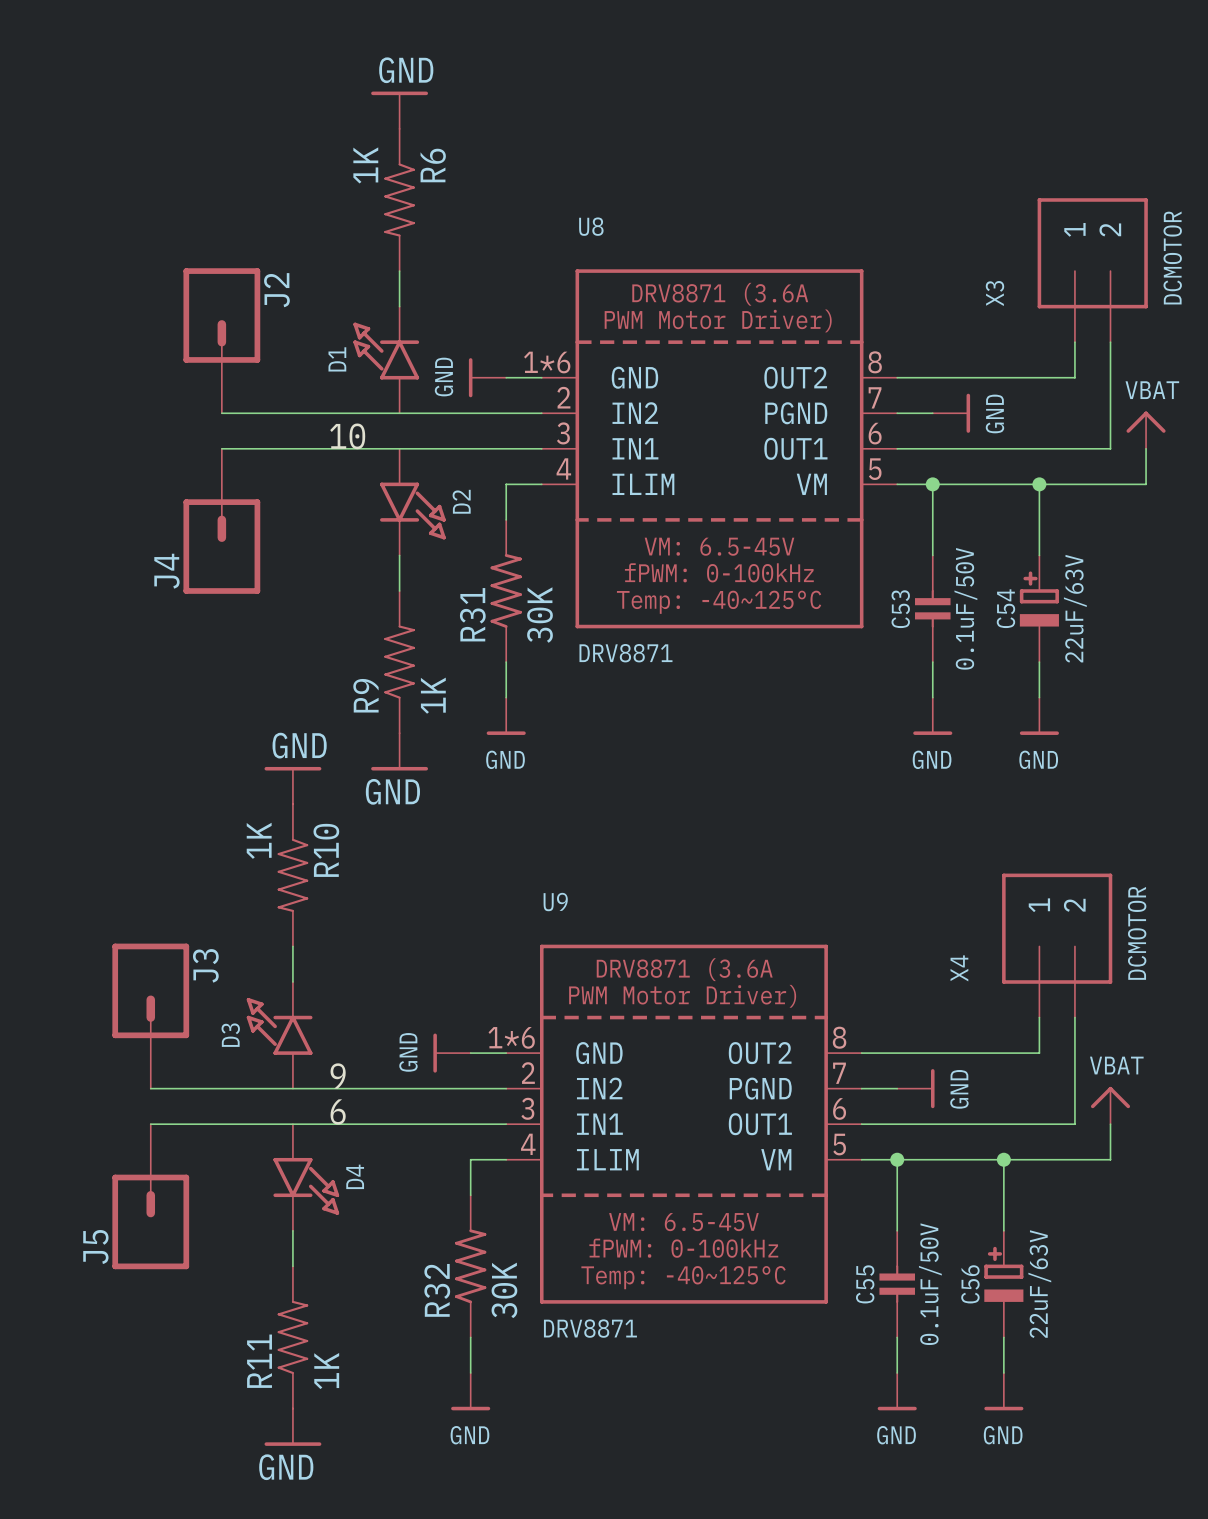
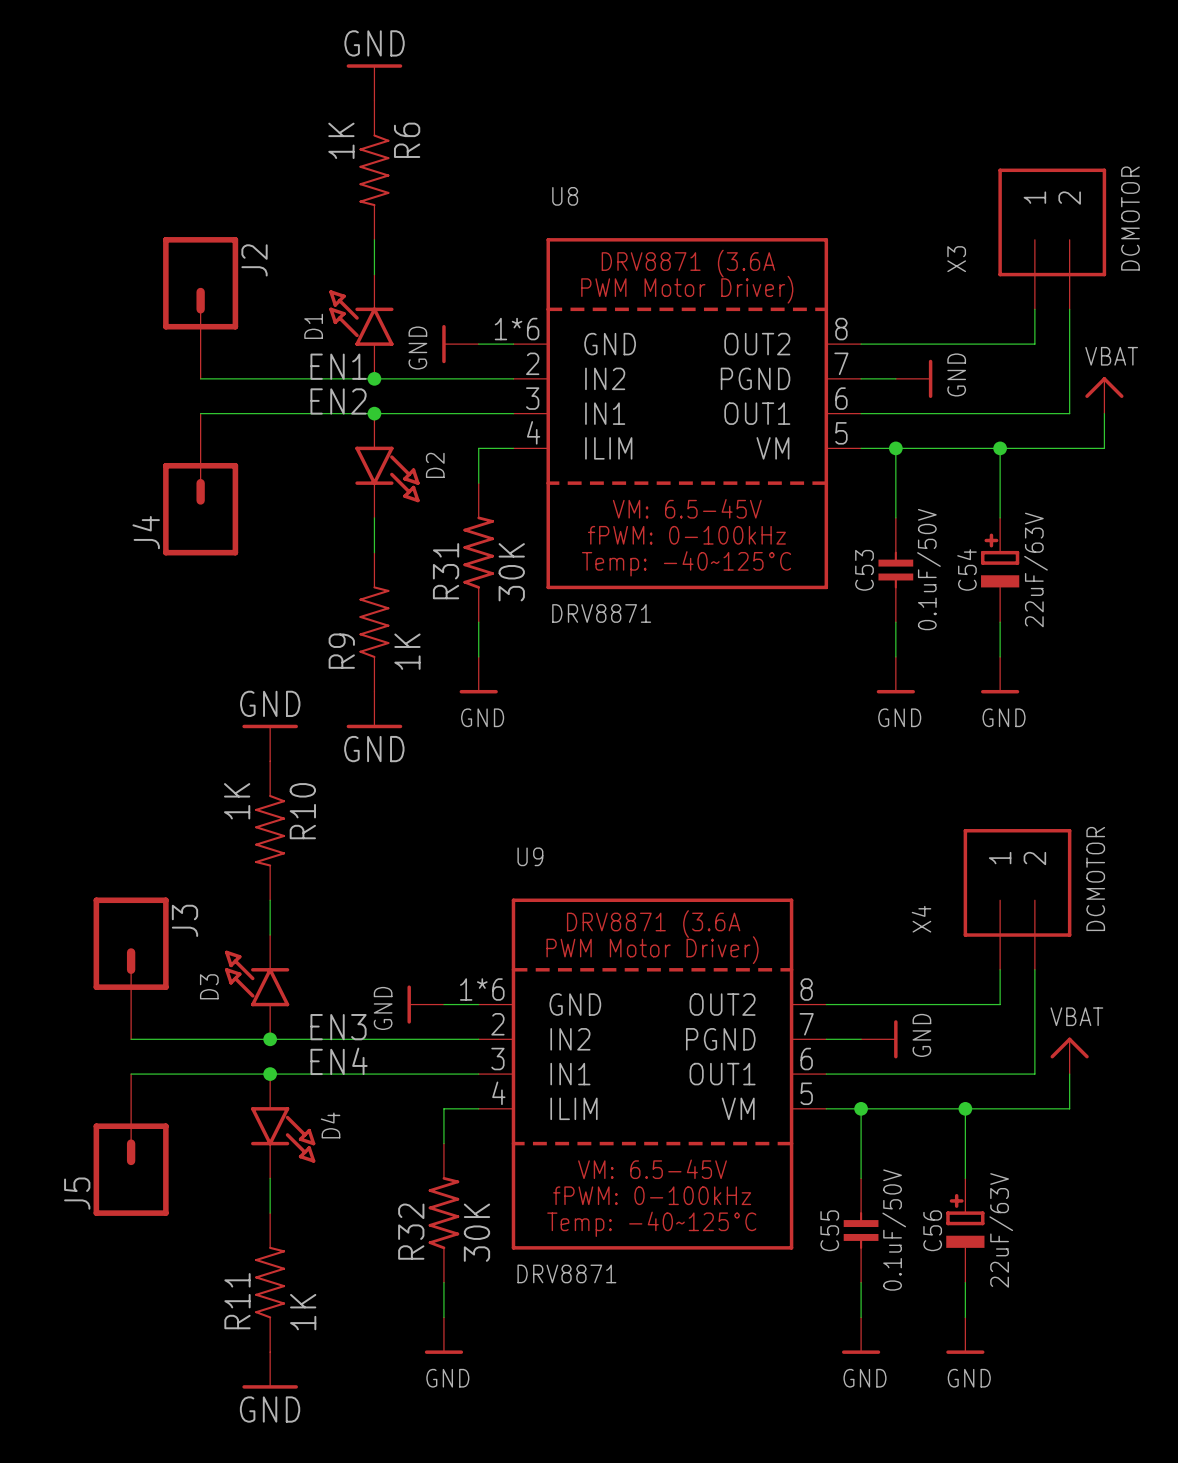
label: none -> EN1 (338, 366)
junction: none -> (374, 378)
label: 10 (347, 436) -> EN2 (338, 401)
junction: none -> (374, 413)
label: 9 (338, 1075) -> EN3 (338, 1027)
junction: none -> (270, 1039)
label: 6 (338, 1111) -> EN4 (339, 1061)
junction: none -> (270, 1074)

